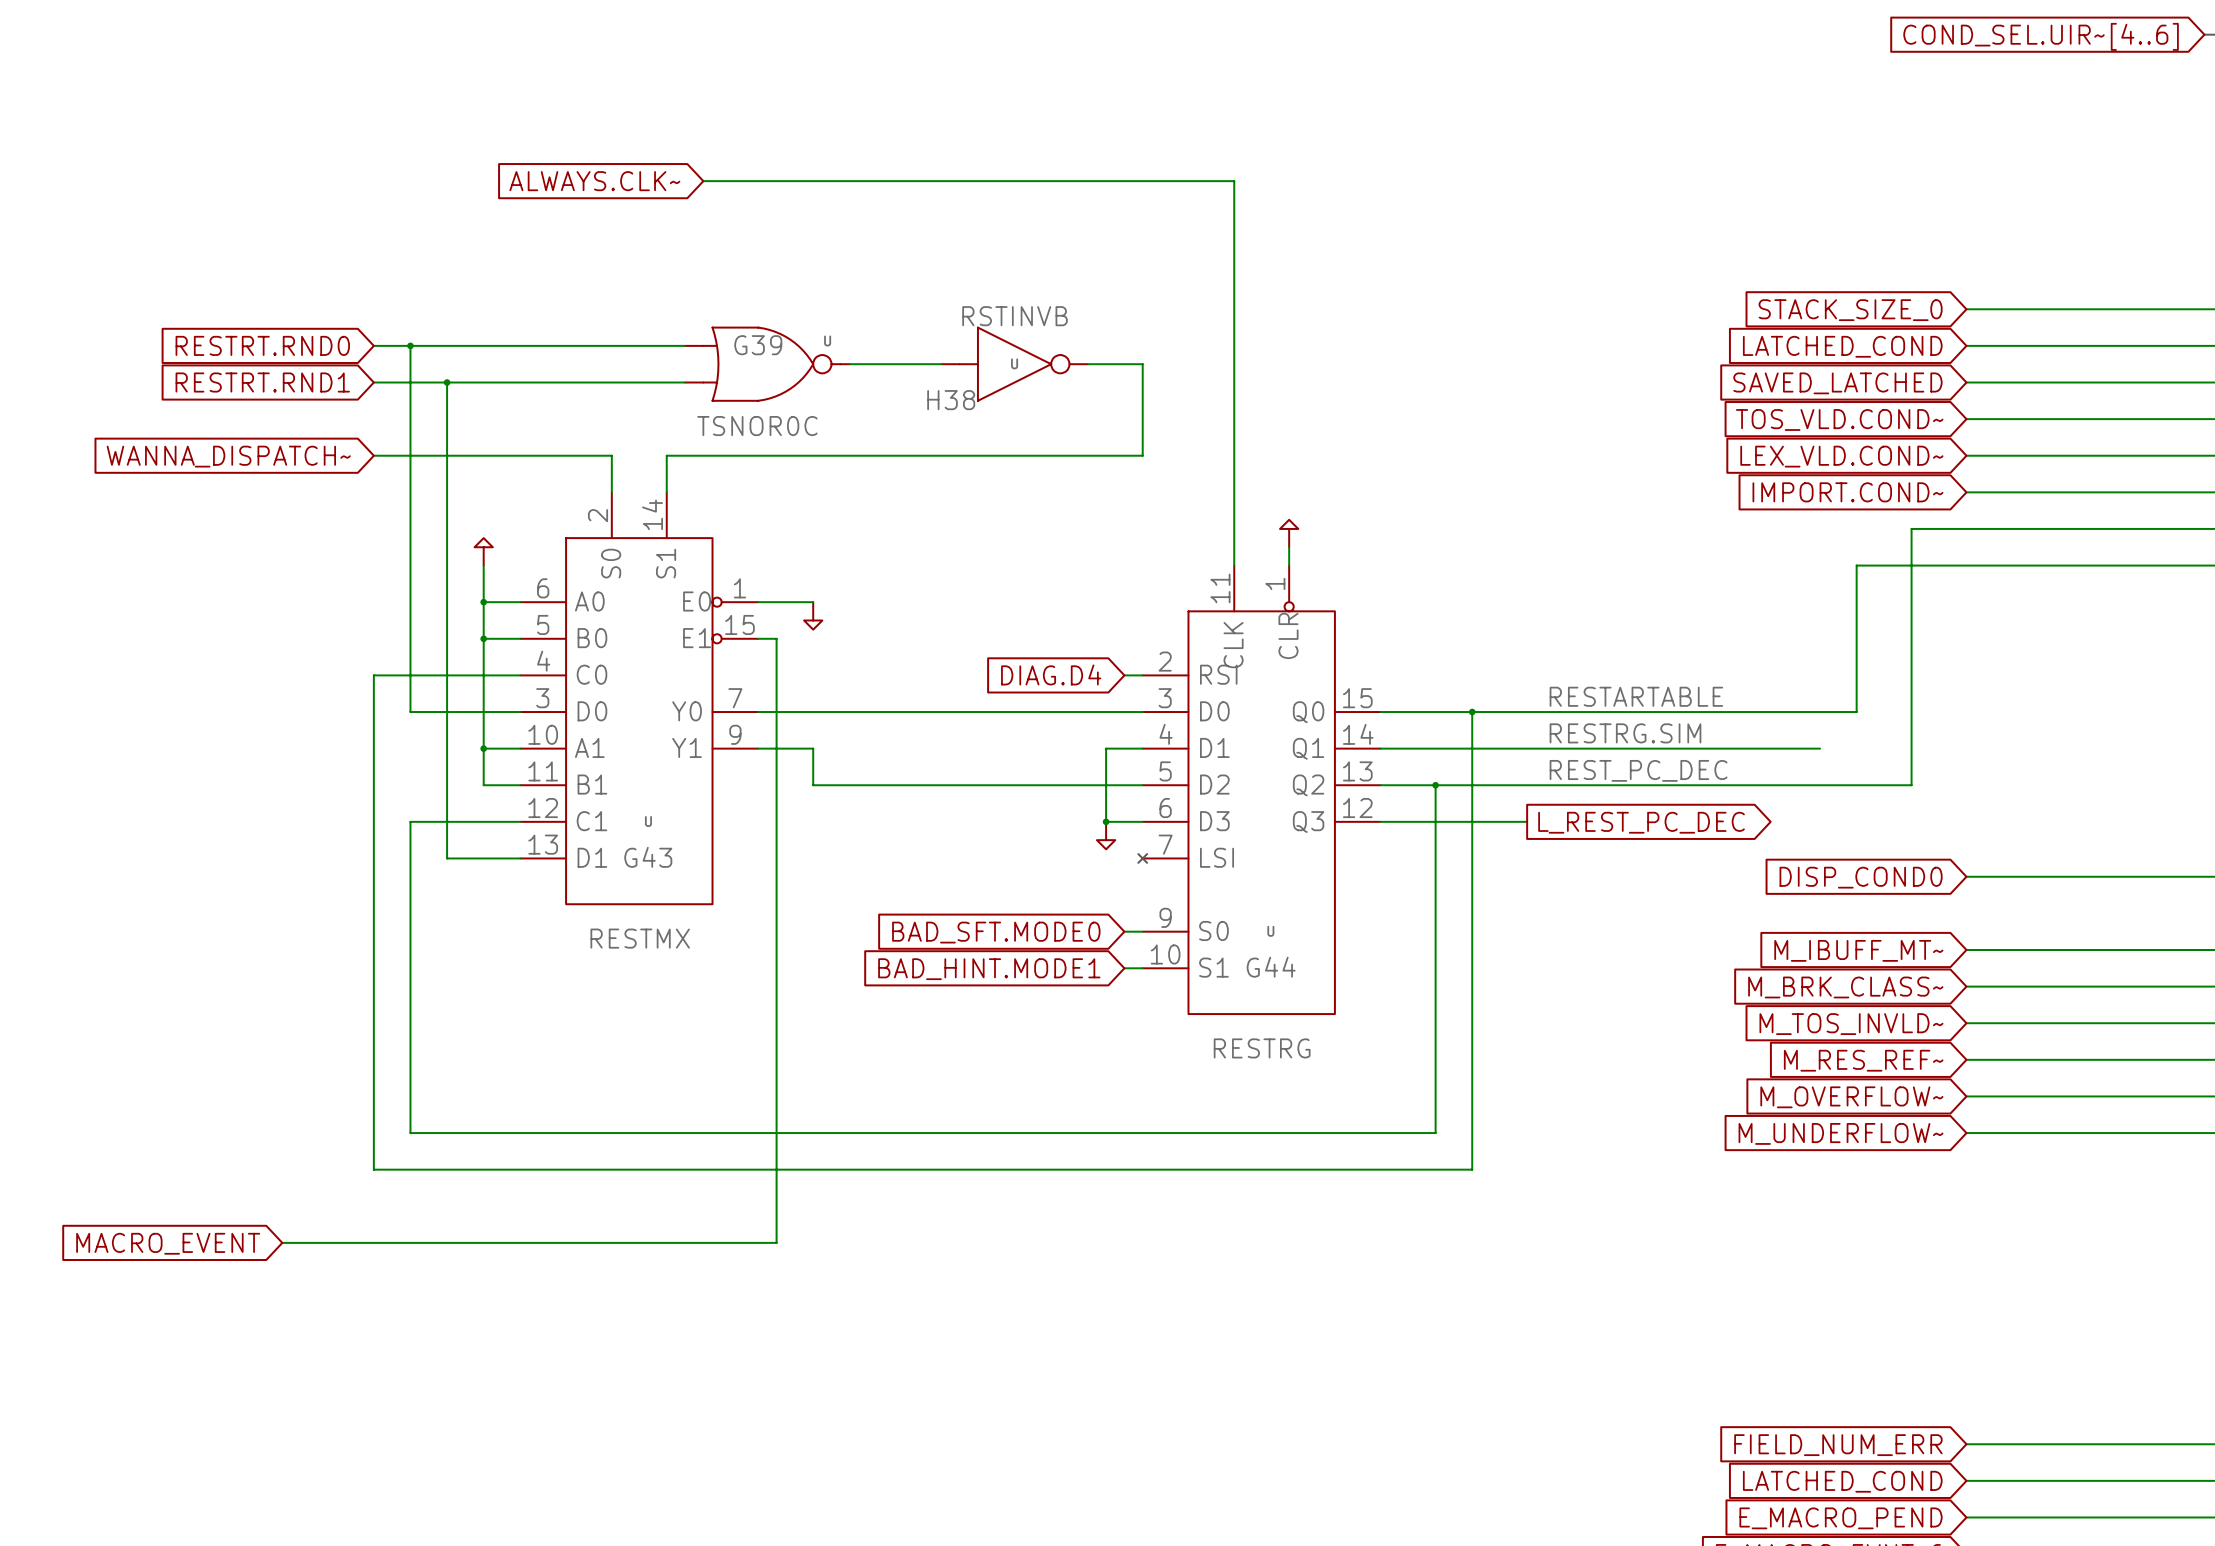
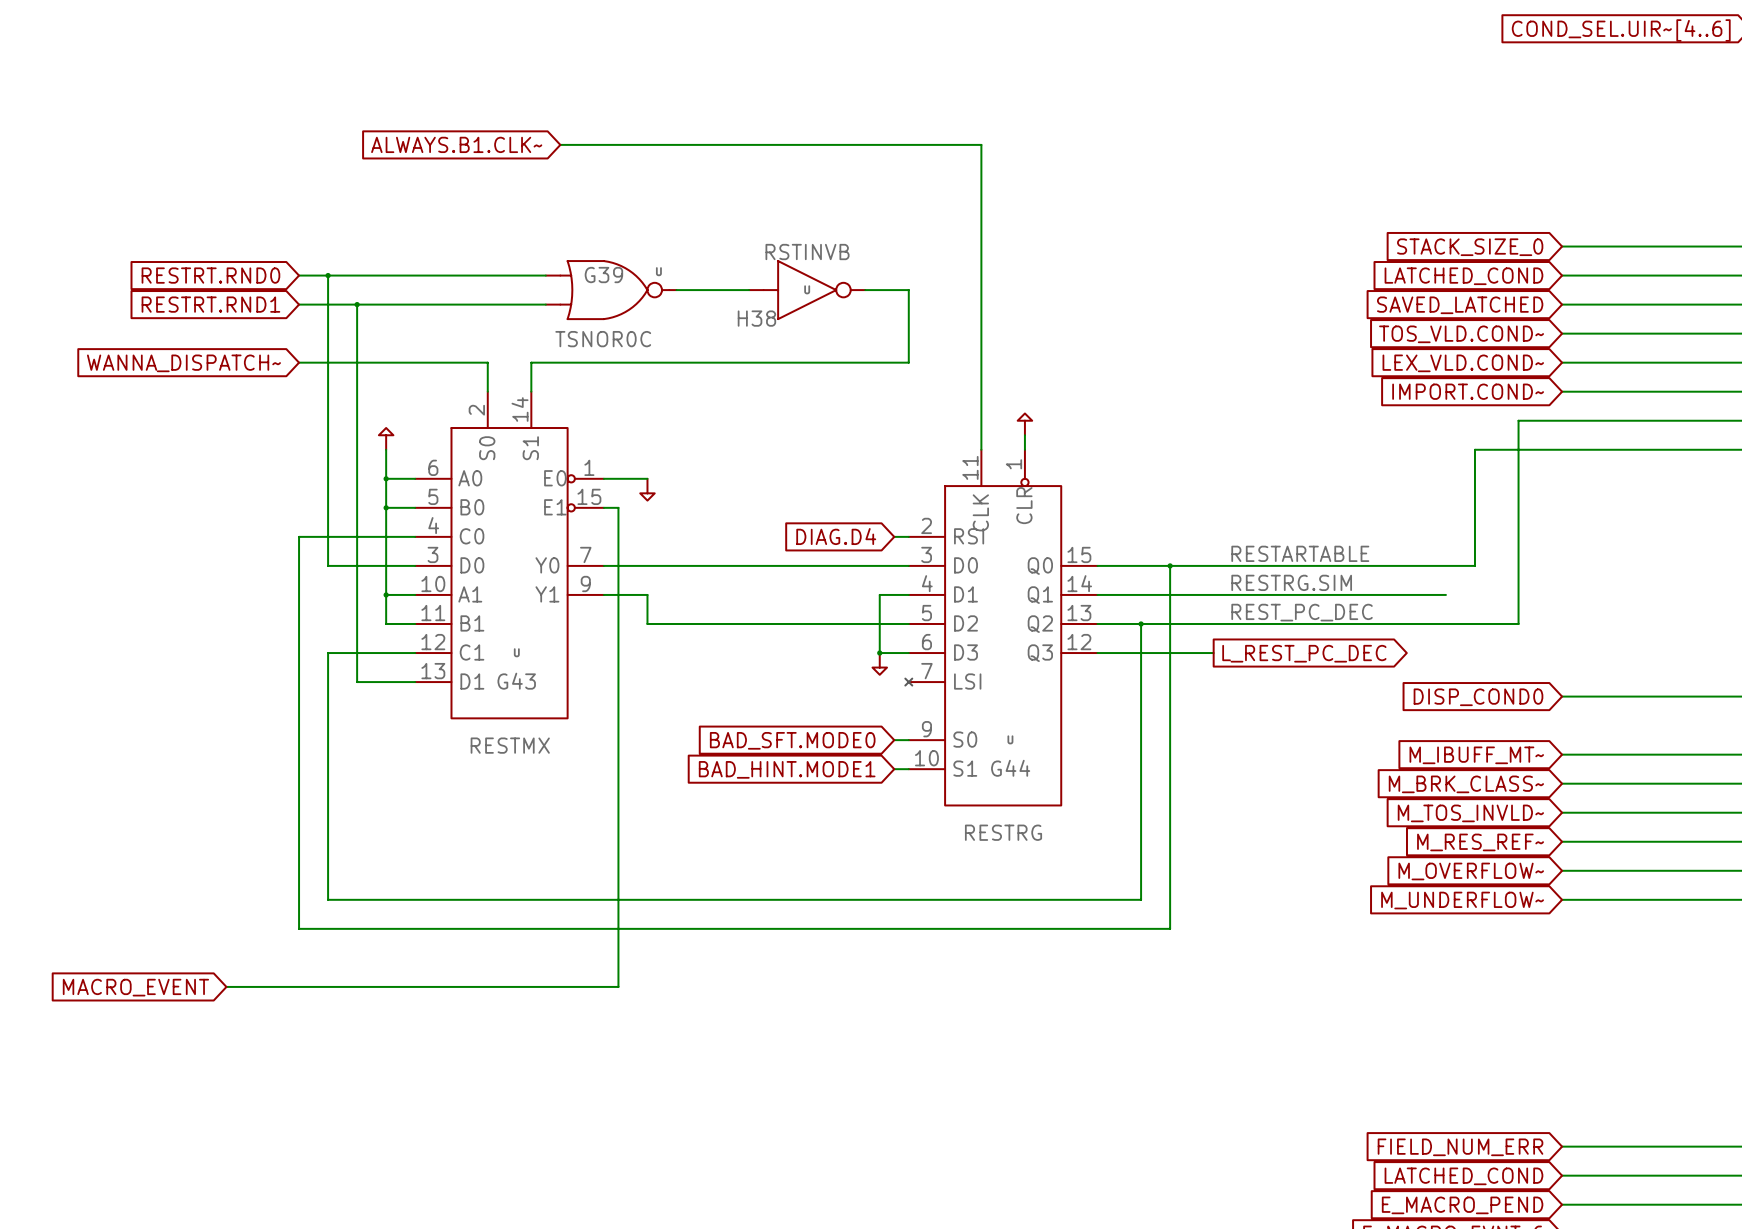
global label: ALWAYS.CLK~ (594, 181) -> ALWAYS.B1.CLK~ (456, 144)

